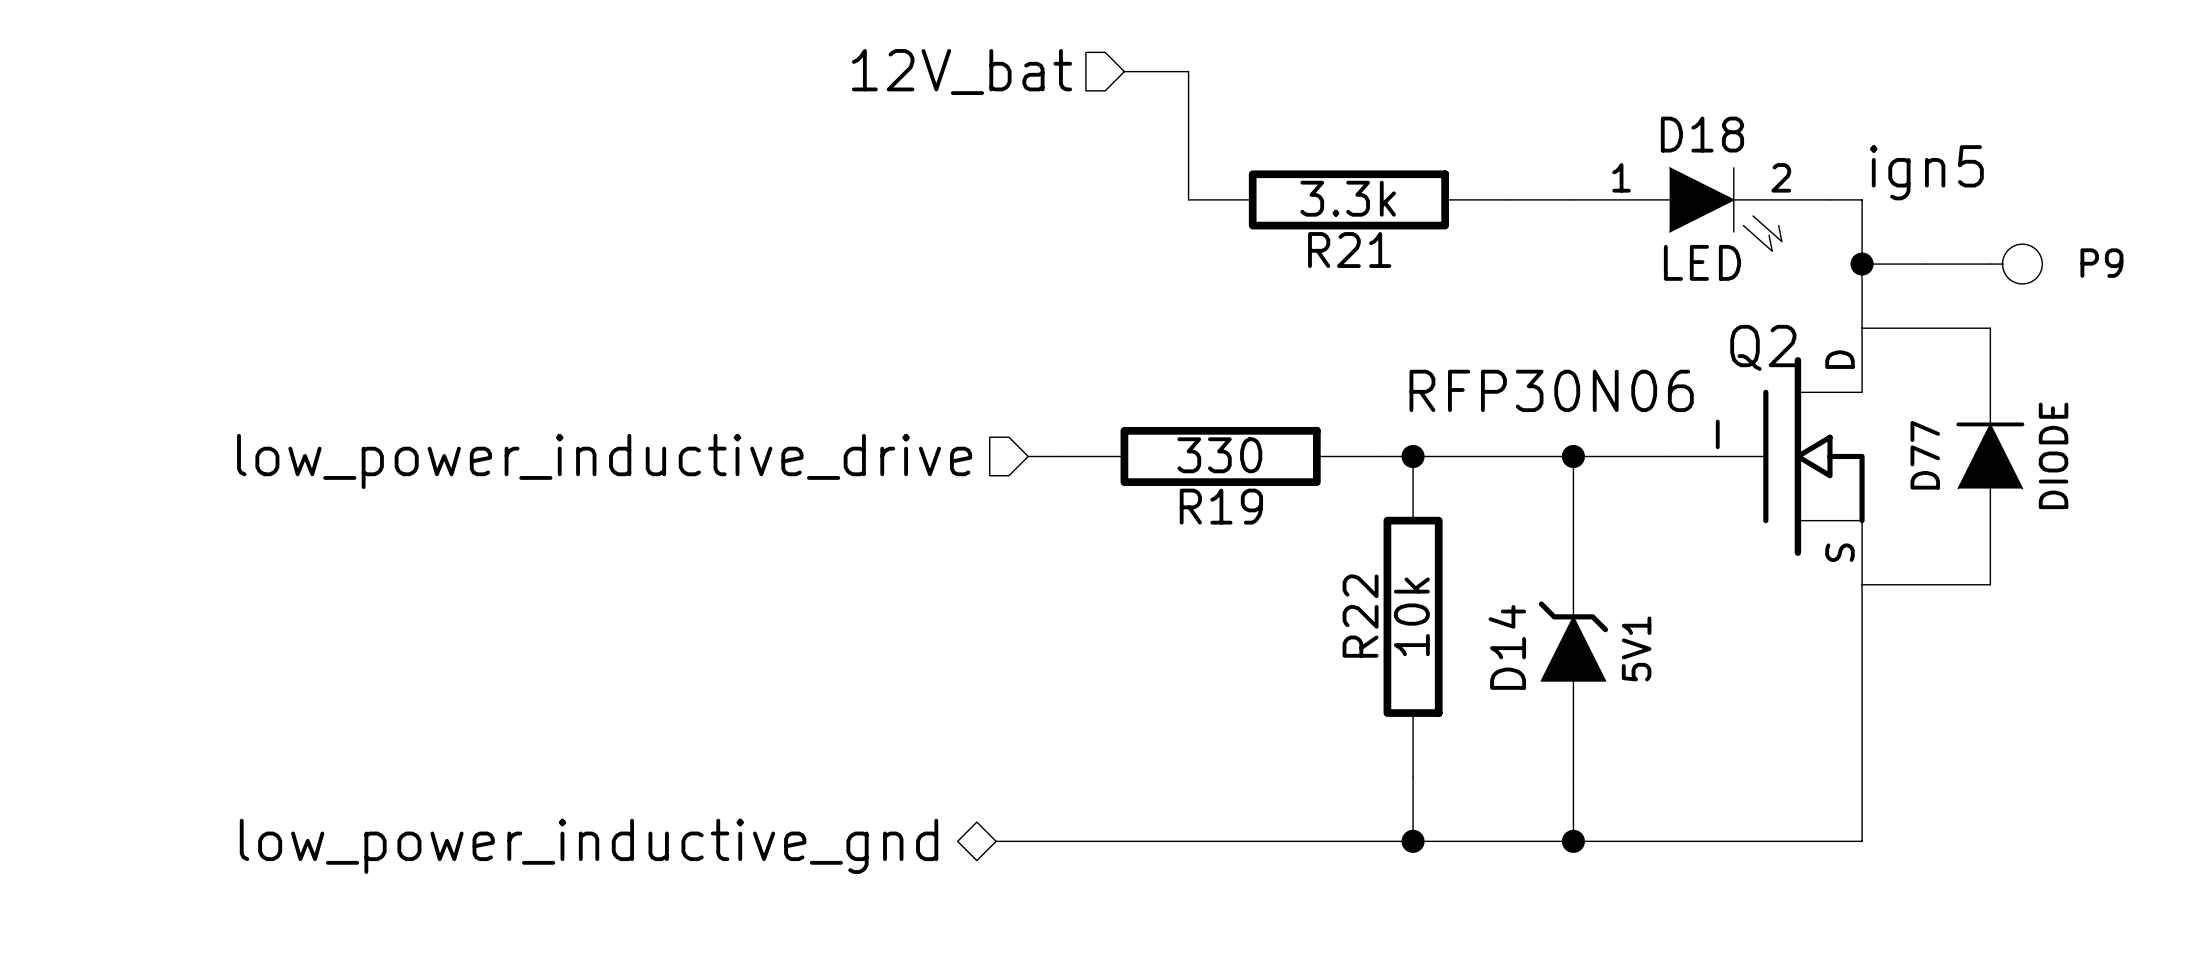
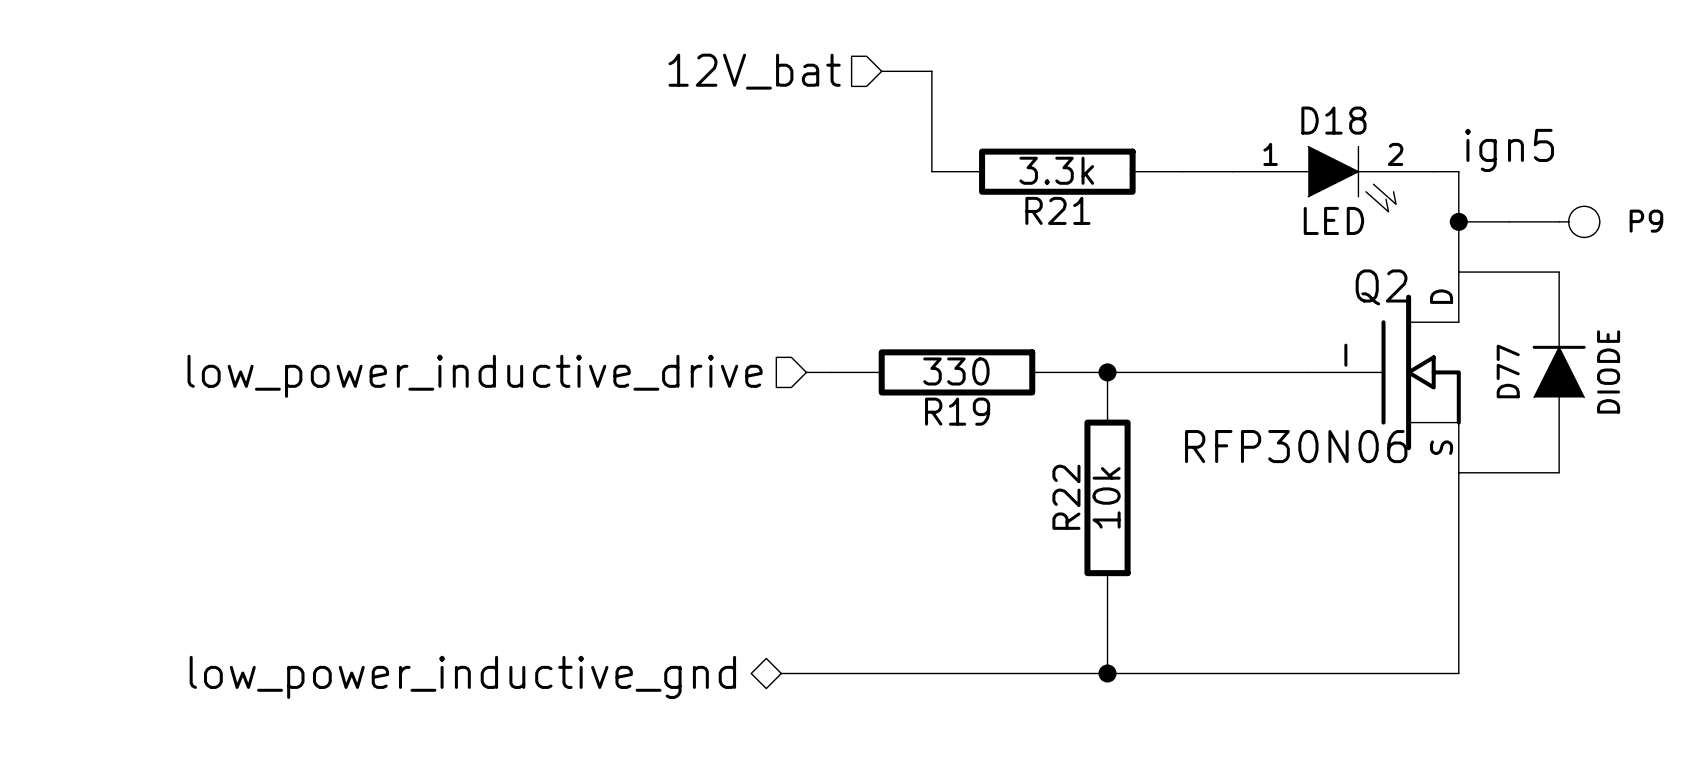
Q2 value position: RFP30N06 (1551, 390) -> RFP30N06 (1296, 446)
wire: (1573, 456) (1573, 520) -> none
junction: (1573, 456) -> none
D14: 5V1 (1573, 648) -> none
wire: (1573, 777) (1573, 841) -> none
junction: (1573, 841) -> none

